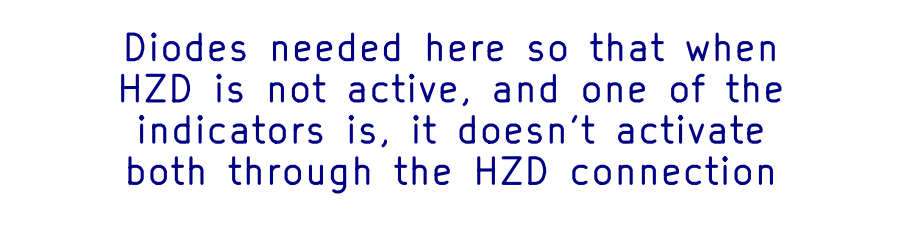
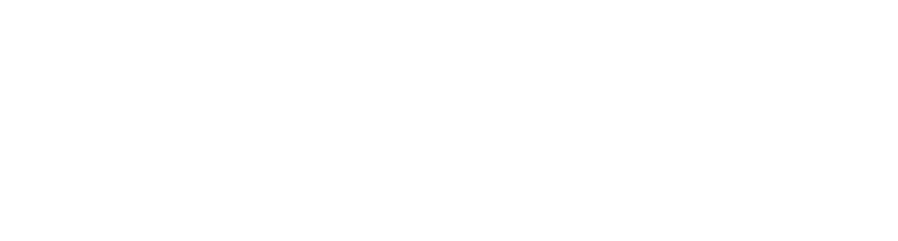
text: Diodes needed here so that when (450, 46) -> none
text: HZD is not active, and one of the (451, 89) -> none
text: indicators is, it doesn't activate (450, 131) -> none
text: both through the HZD connection (450, 174) -> none

